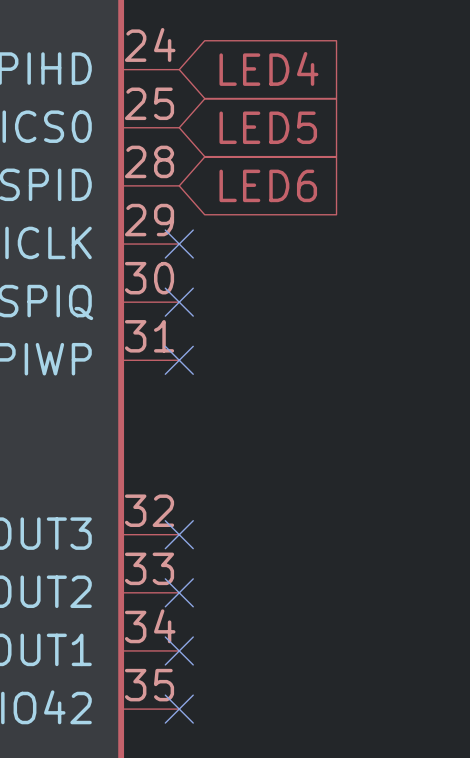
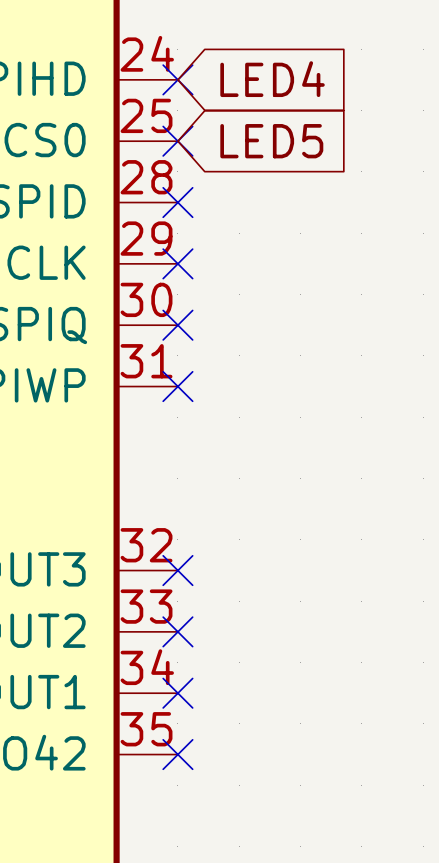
no-connect mark: none -> (177, 79)
no-connect mark: none -> (177, 141)
no-connect mark: none -> (177, 202)
global label: LED6 (268, 185) -> none

